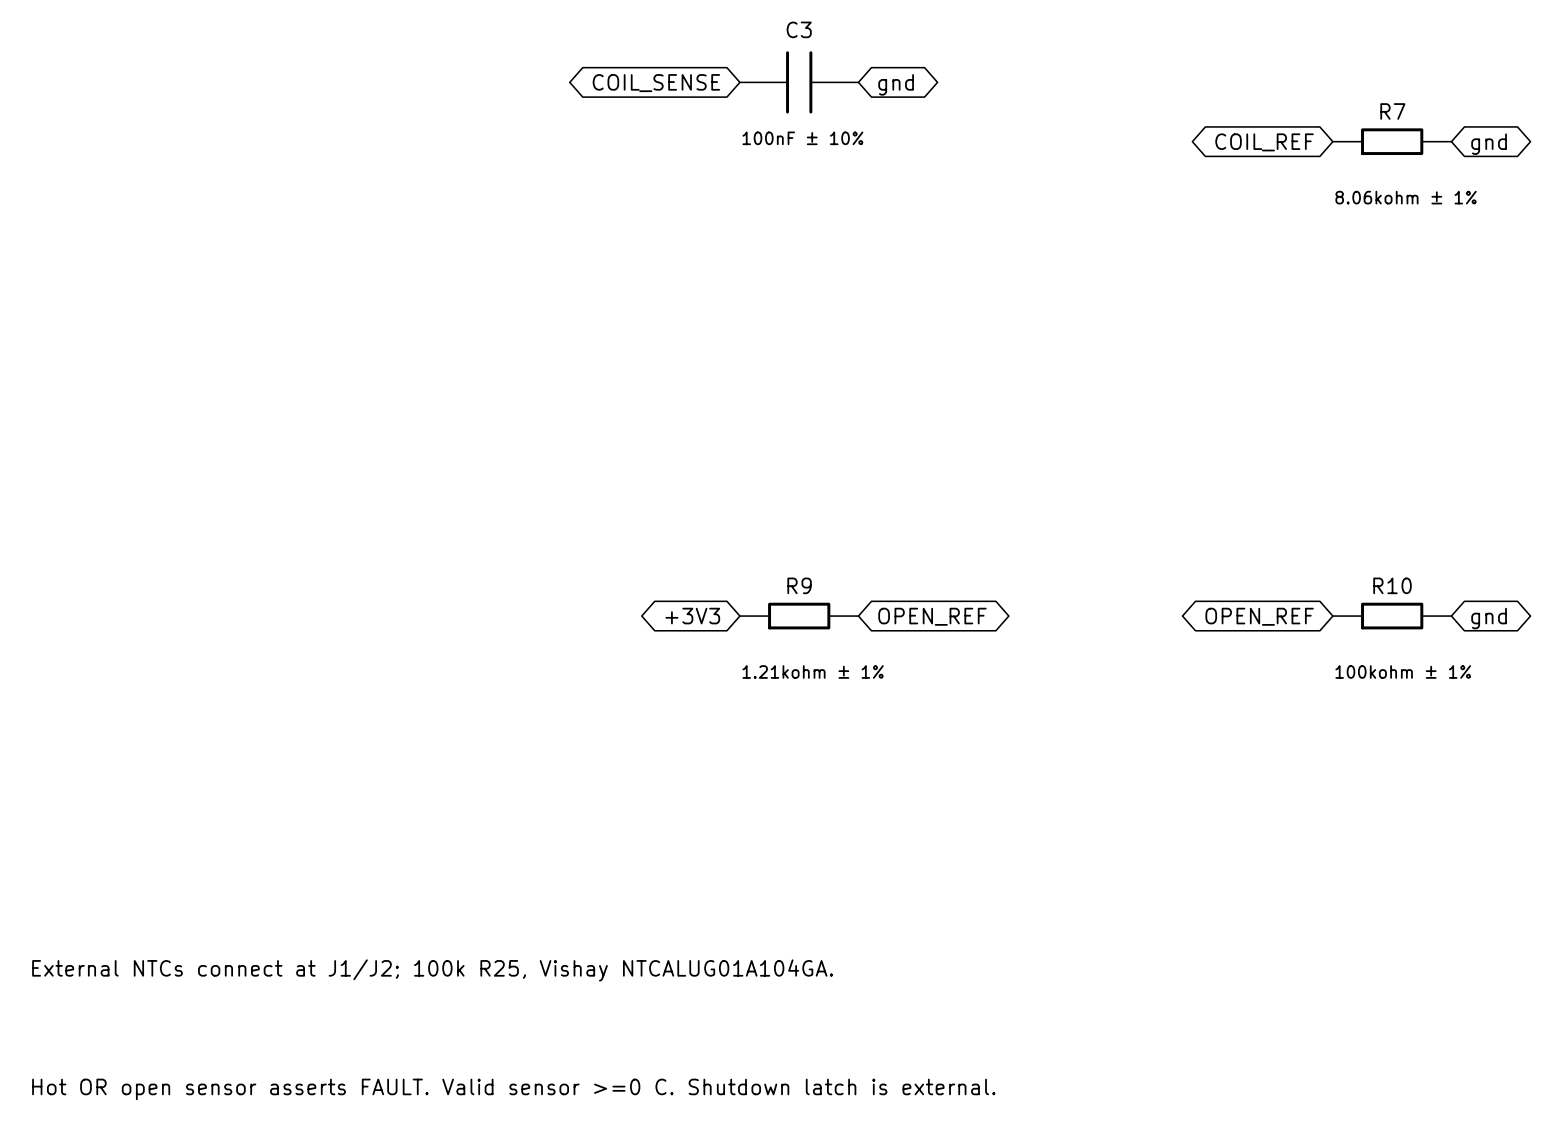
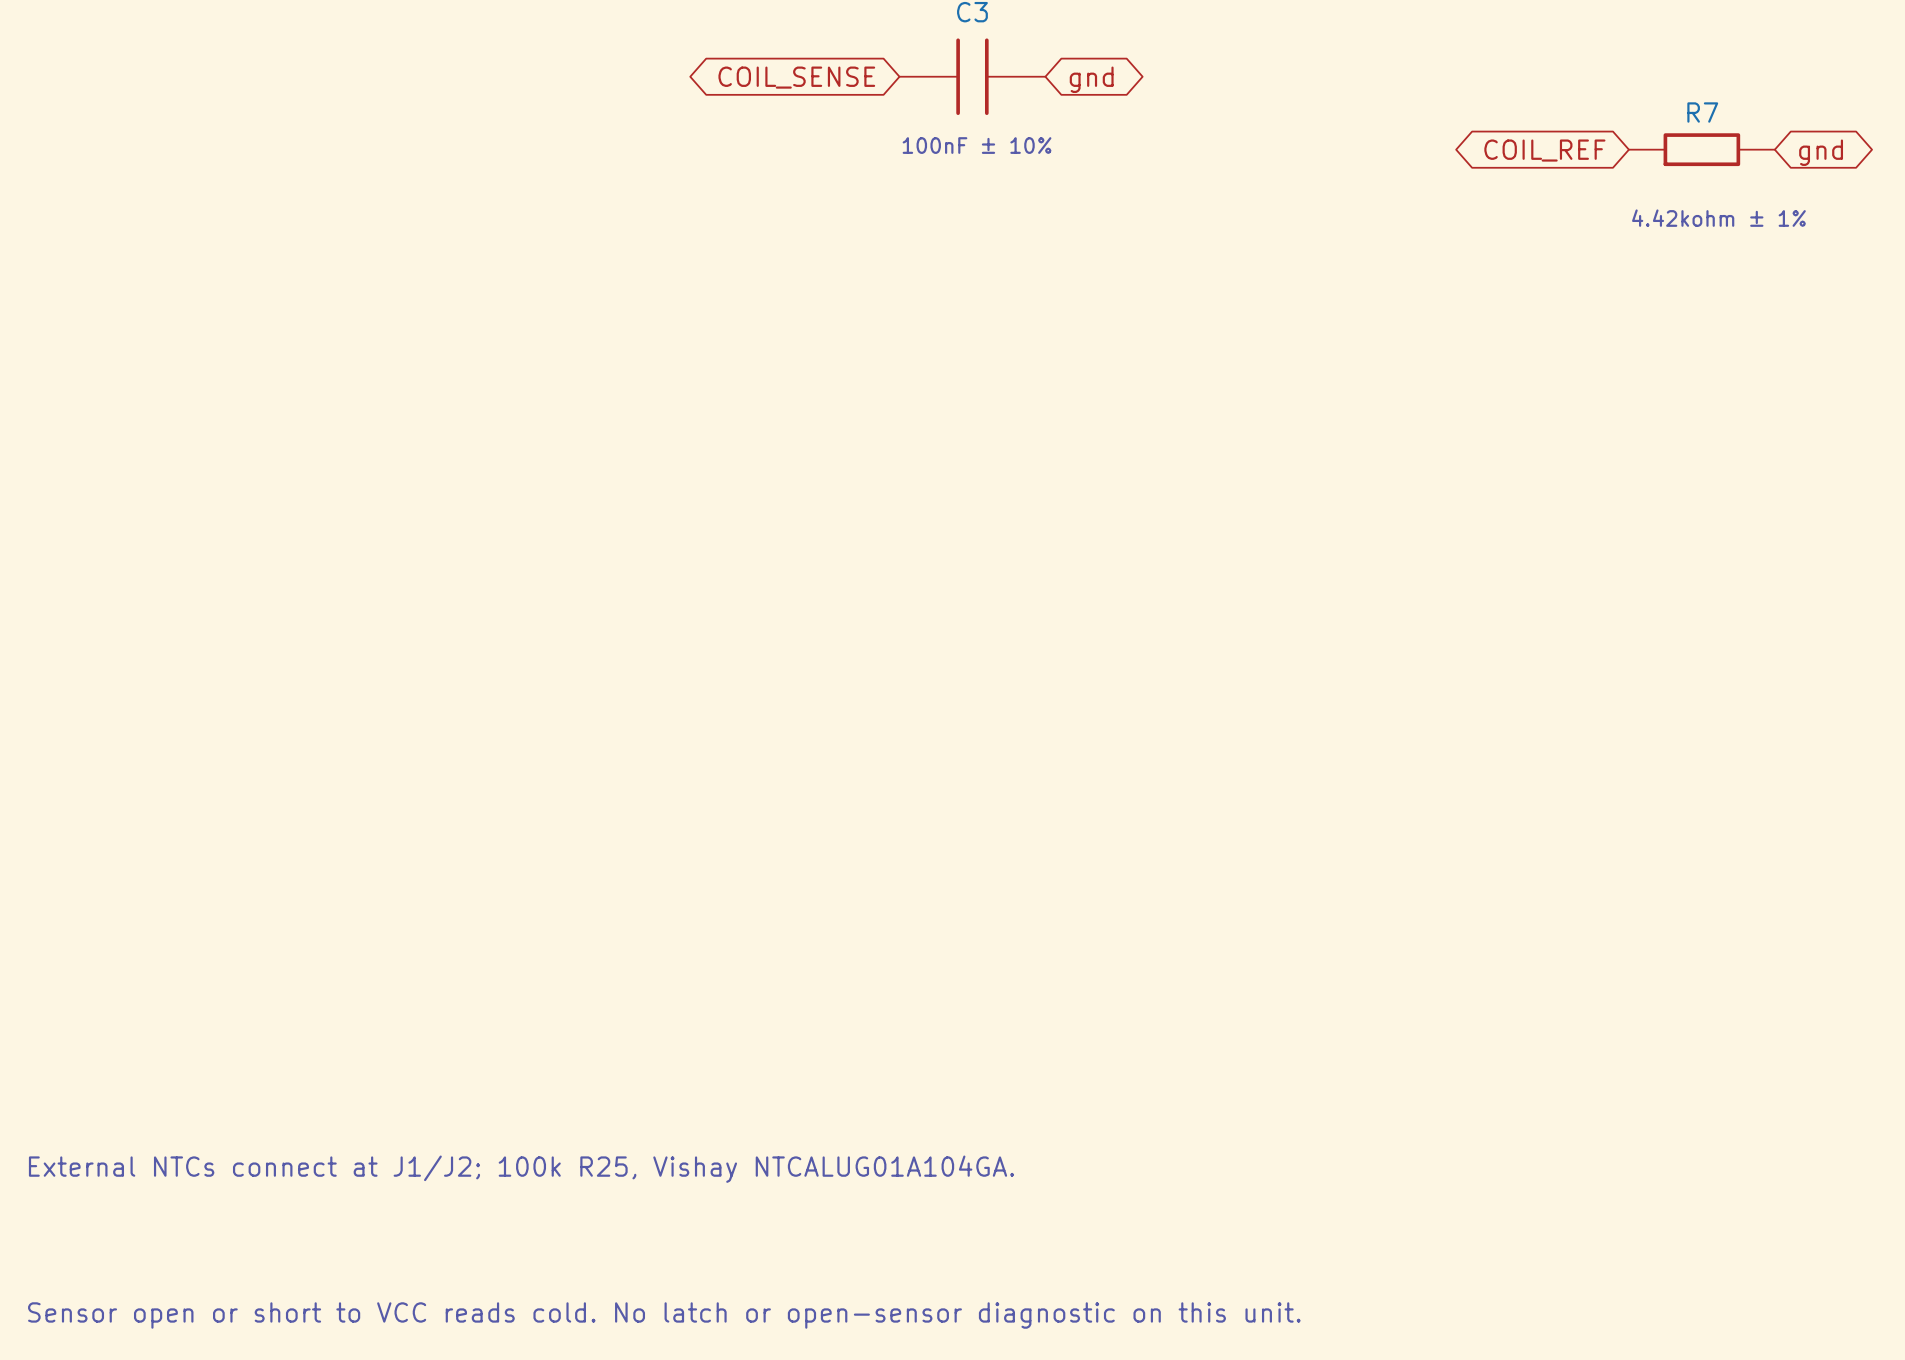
text: 8.06kohm ± 1% (1406, 197) -> 4.42kohm ± 1% (1718, 218)
global label: +3V3 (692, 616) -> none
R9: (799, 616) -> none
global label: OPEN_REF (932, 616) -> none
global label: OPEN_REF (1259, 616) -> none
R10: (1392, 616) -> none
global label: gnd (1489, 618) -> none
text: 1.21kohm ± 1% (813, 671) -> none
text: 100kohm ± 1% (1403, 671) -> none
text: Hot OR open sensor asserts FAULT. Valid sensor >=0 C. Shutdown latch is external. (513, 1089) -> Sensor open or short to VCC reads cold. No latch or open-sensor diagnostic on this unit. (664, 1315)

